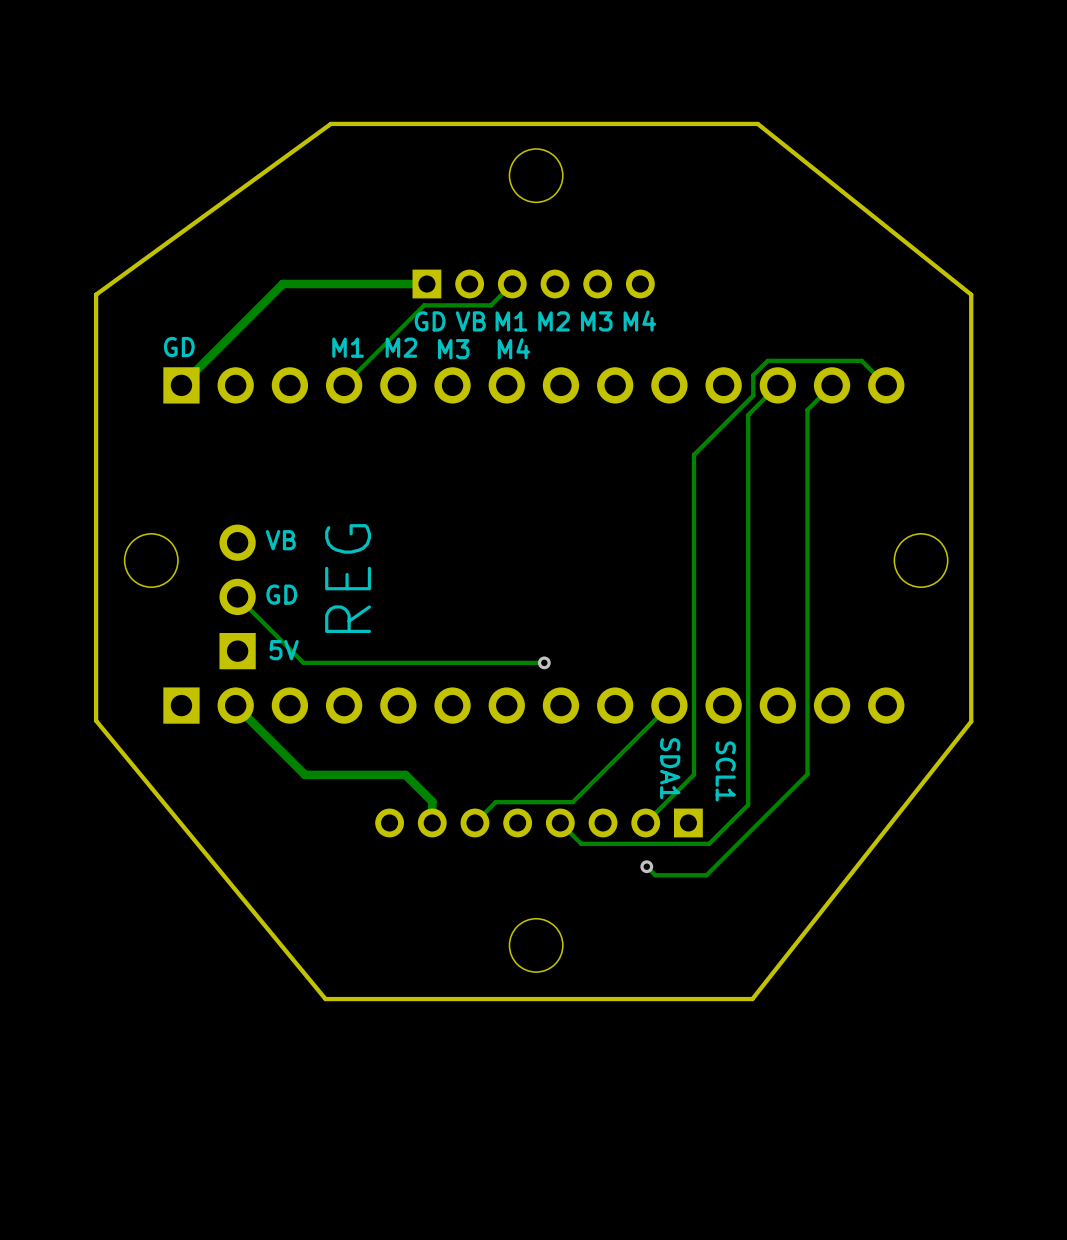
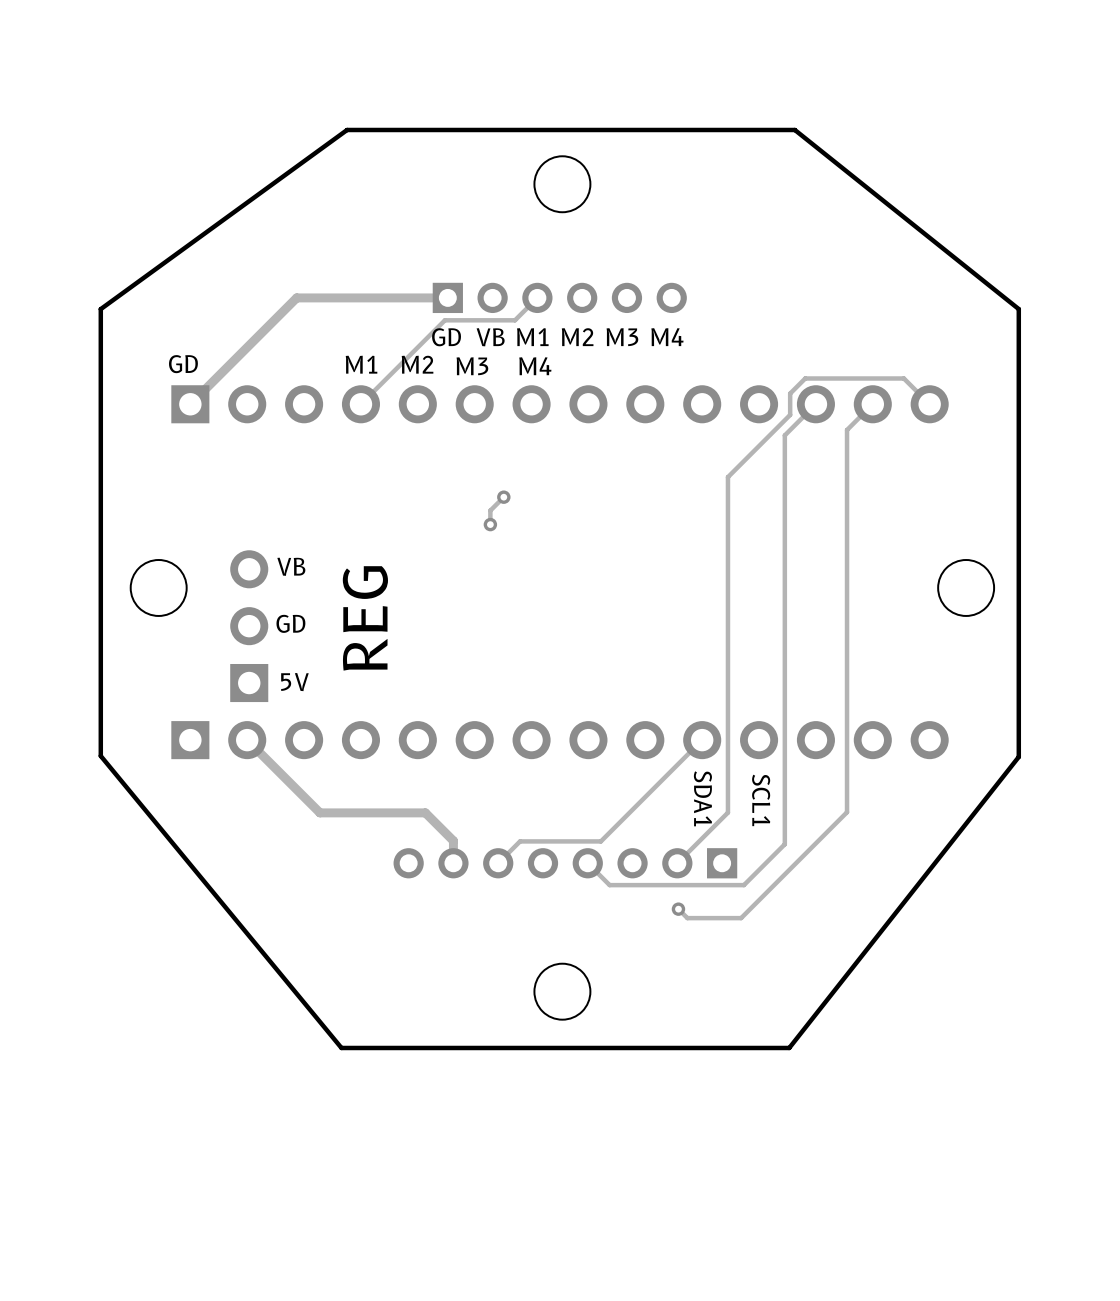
track: none -> (503, 497) (490, 510) (490, 524)
via: none -> (503, 497)
via: none -> (490, 524)
track: (237, 596) (303, 662) (544, 662) -> none
via: (544, 662) -> none

